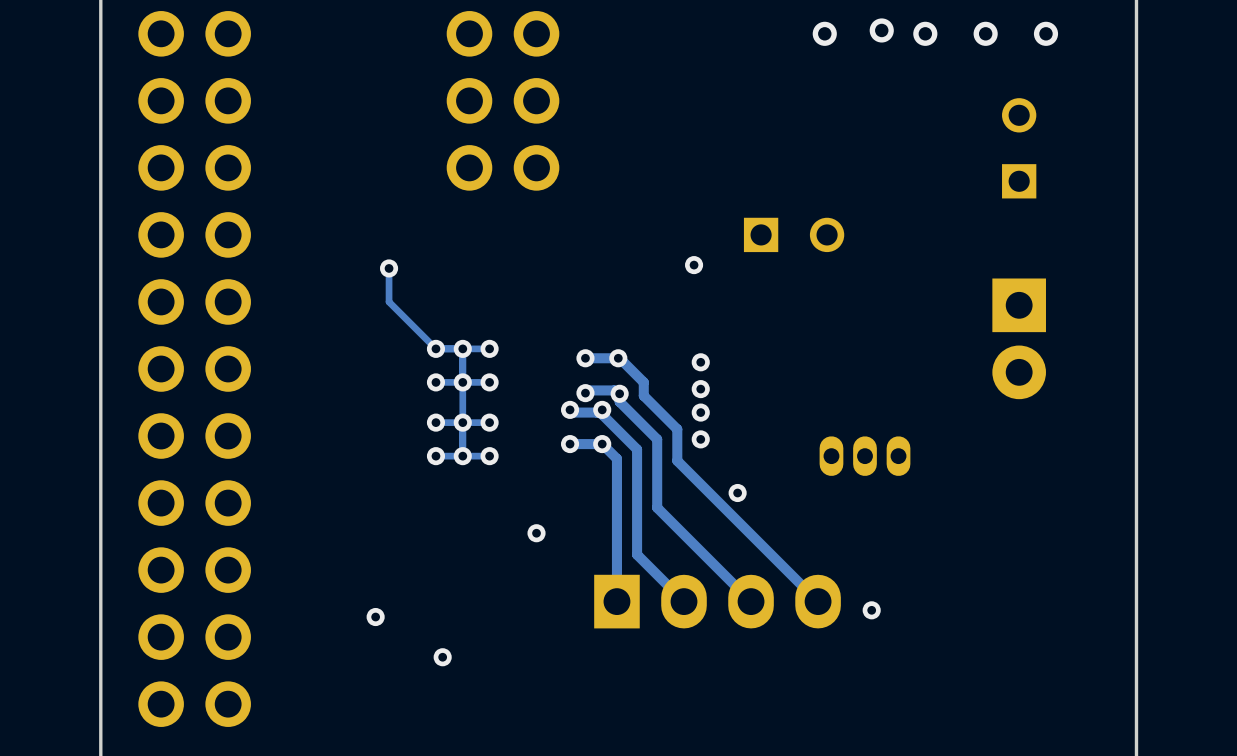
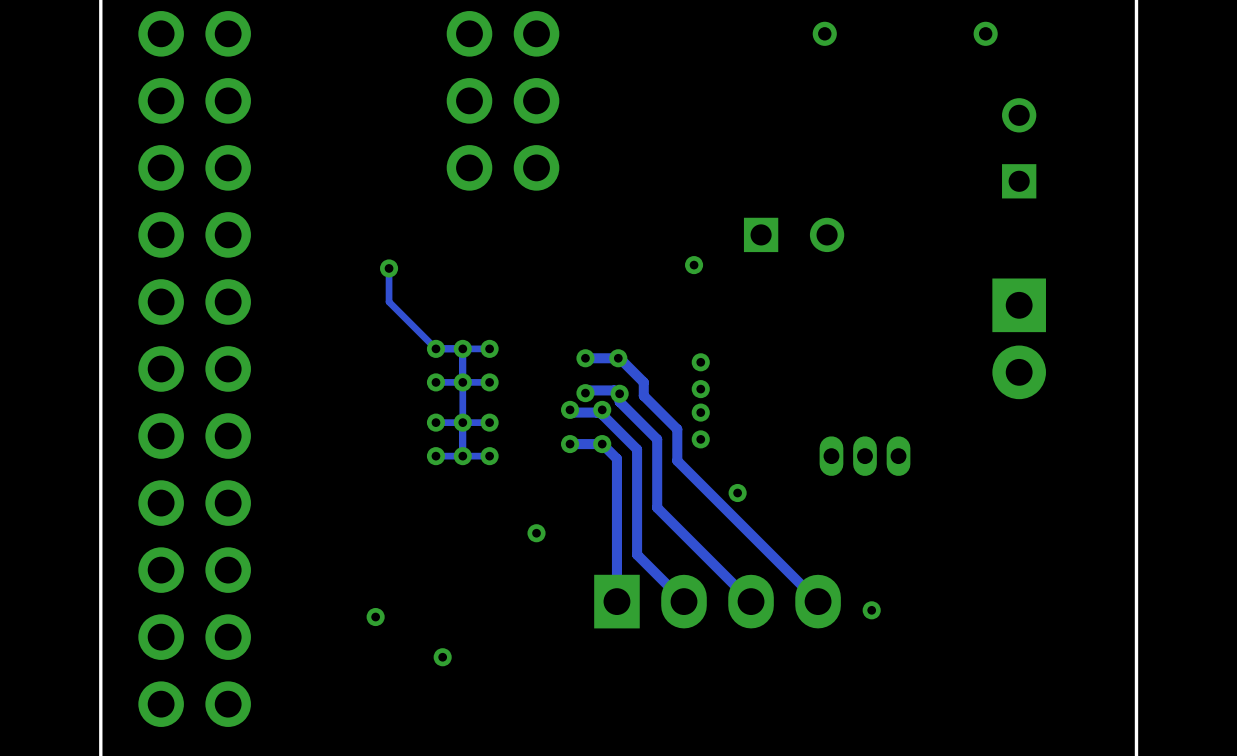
via: (881, 30) -> none
via: (925, 33) -> none
via: (1045, 33) -> none

